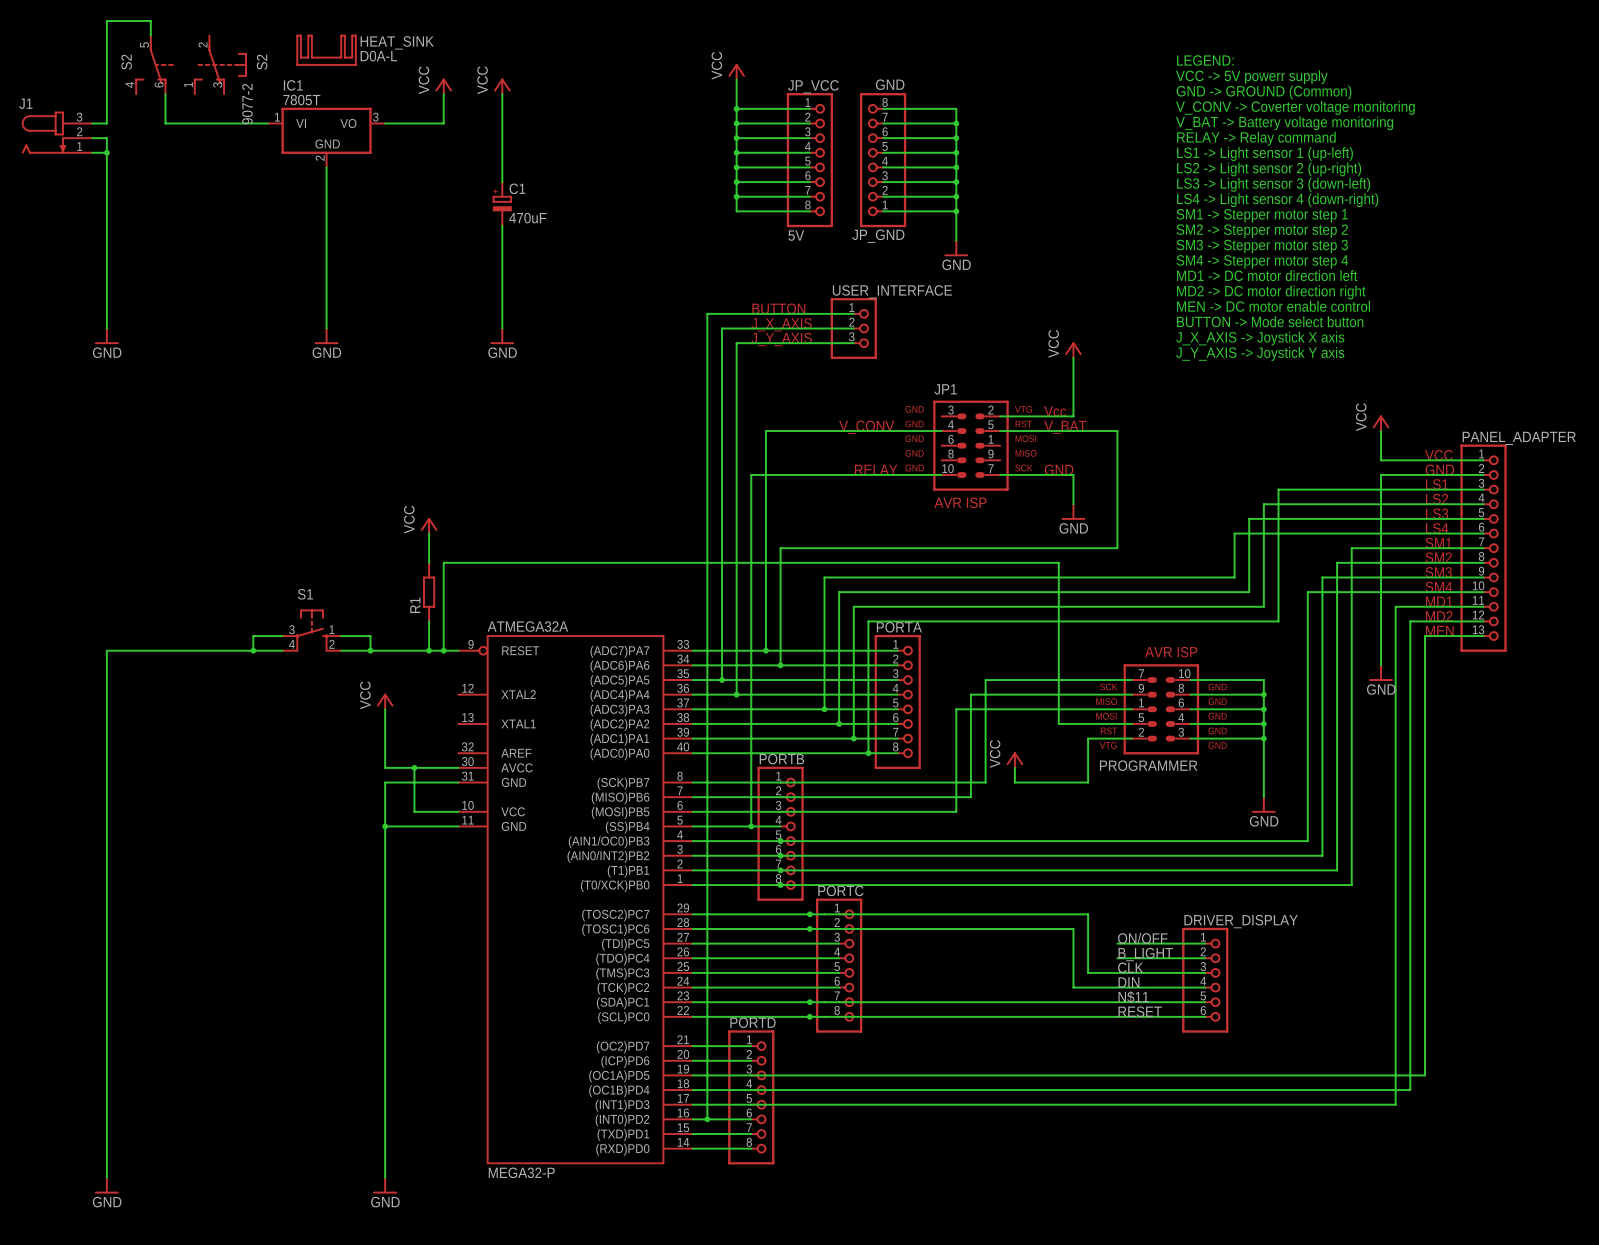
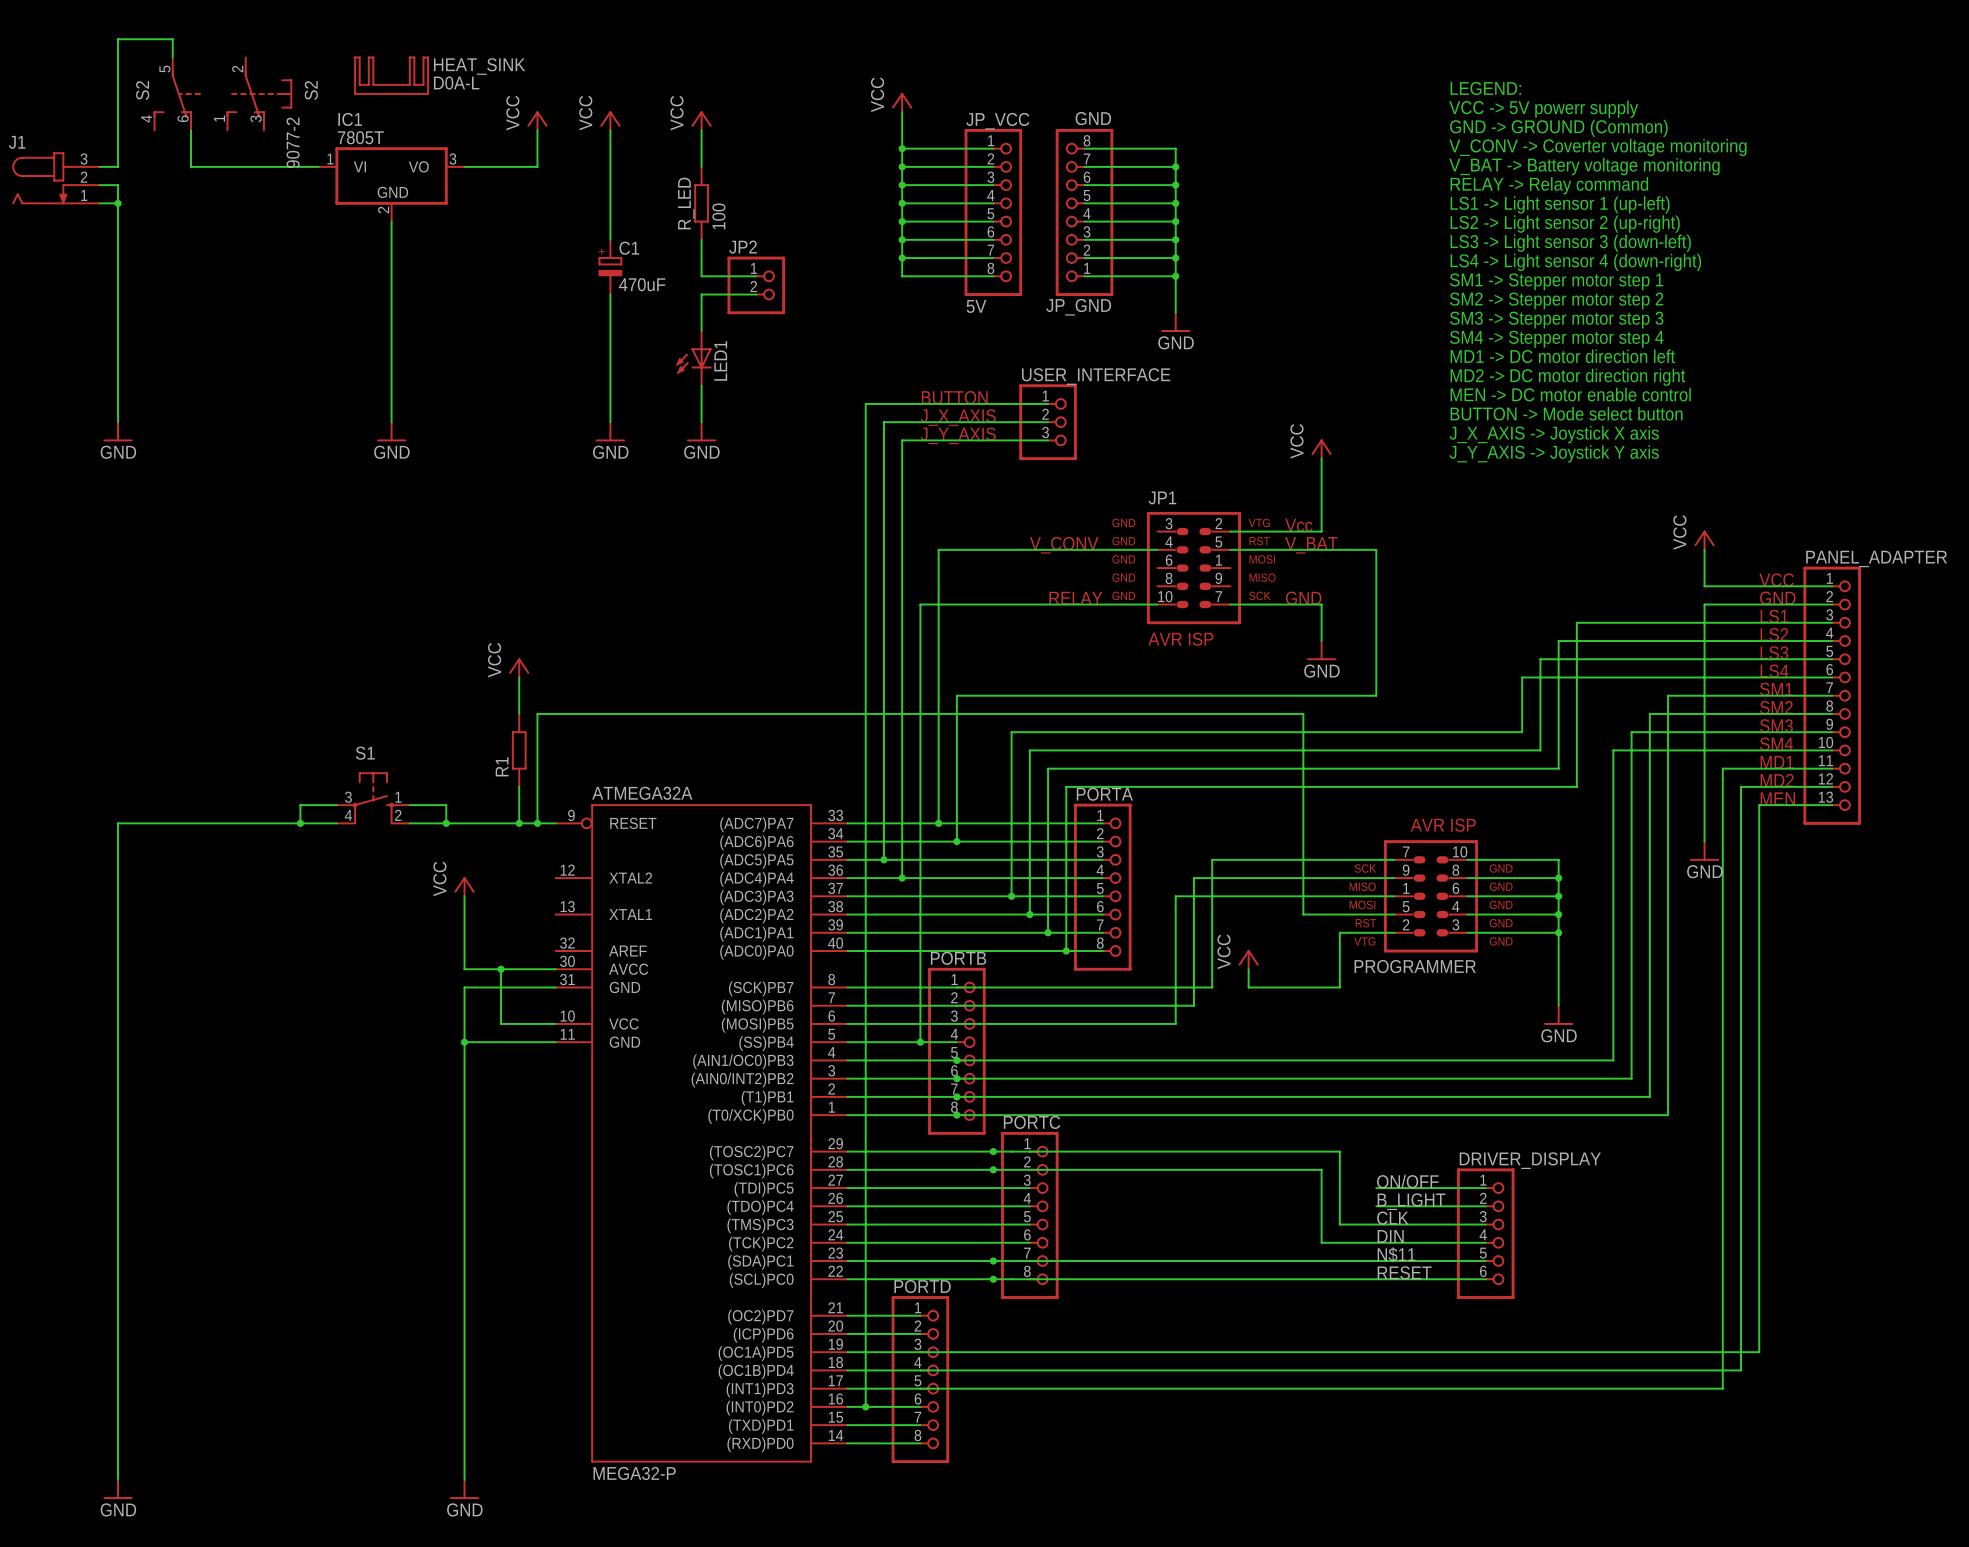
power symbol: none -> VCC (701, 120)
wire: none -> (701, 130) (701, 166)
R_LED: none -> 100 (701, 203)
wire: none -> (701, 239) (701, 276) (756, 276)
JP2: none -> (756, 285)
wire: none -> (756, 294) (701, 294) (701, 331)
LED1: none -> (694, 358)
wire: none -> (701, 385) (701, 422)
power symbol: none -> GND (701, 431)

